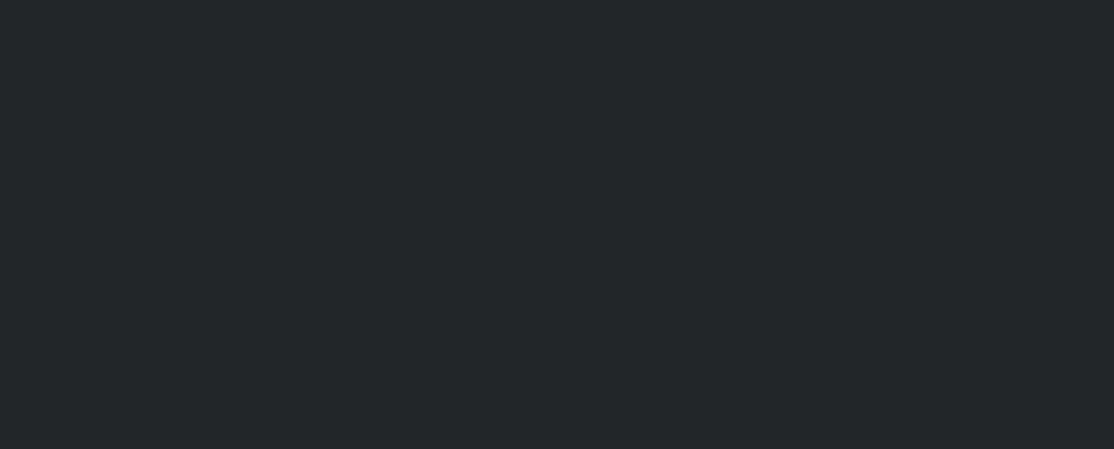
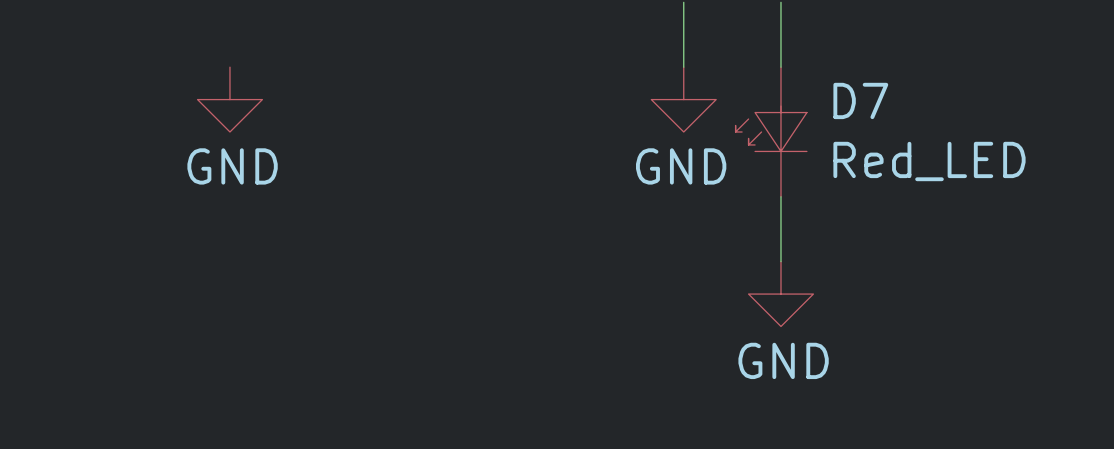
wire: none -> (683, 2) (683, 67)
wire: none -> (780, 2) (780, 67)
power symbol: none -> GND (229, 99)
power symbol: none -> GND (683, 99)
D7: none -> Red_LED (771, 131)
wire: none -> (780, 196) (780, 261)
power symbol: none -> GND (780, 294)

